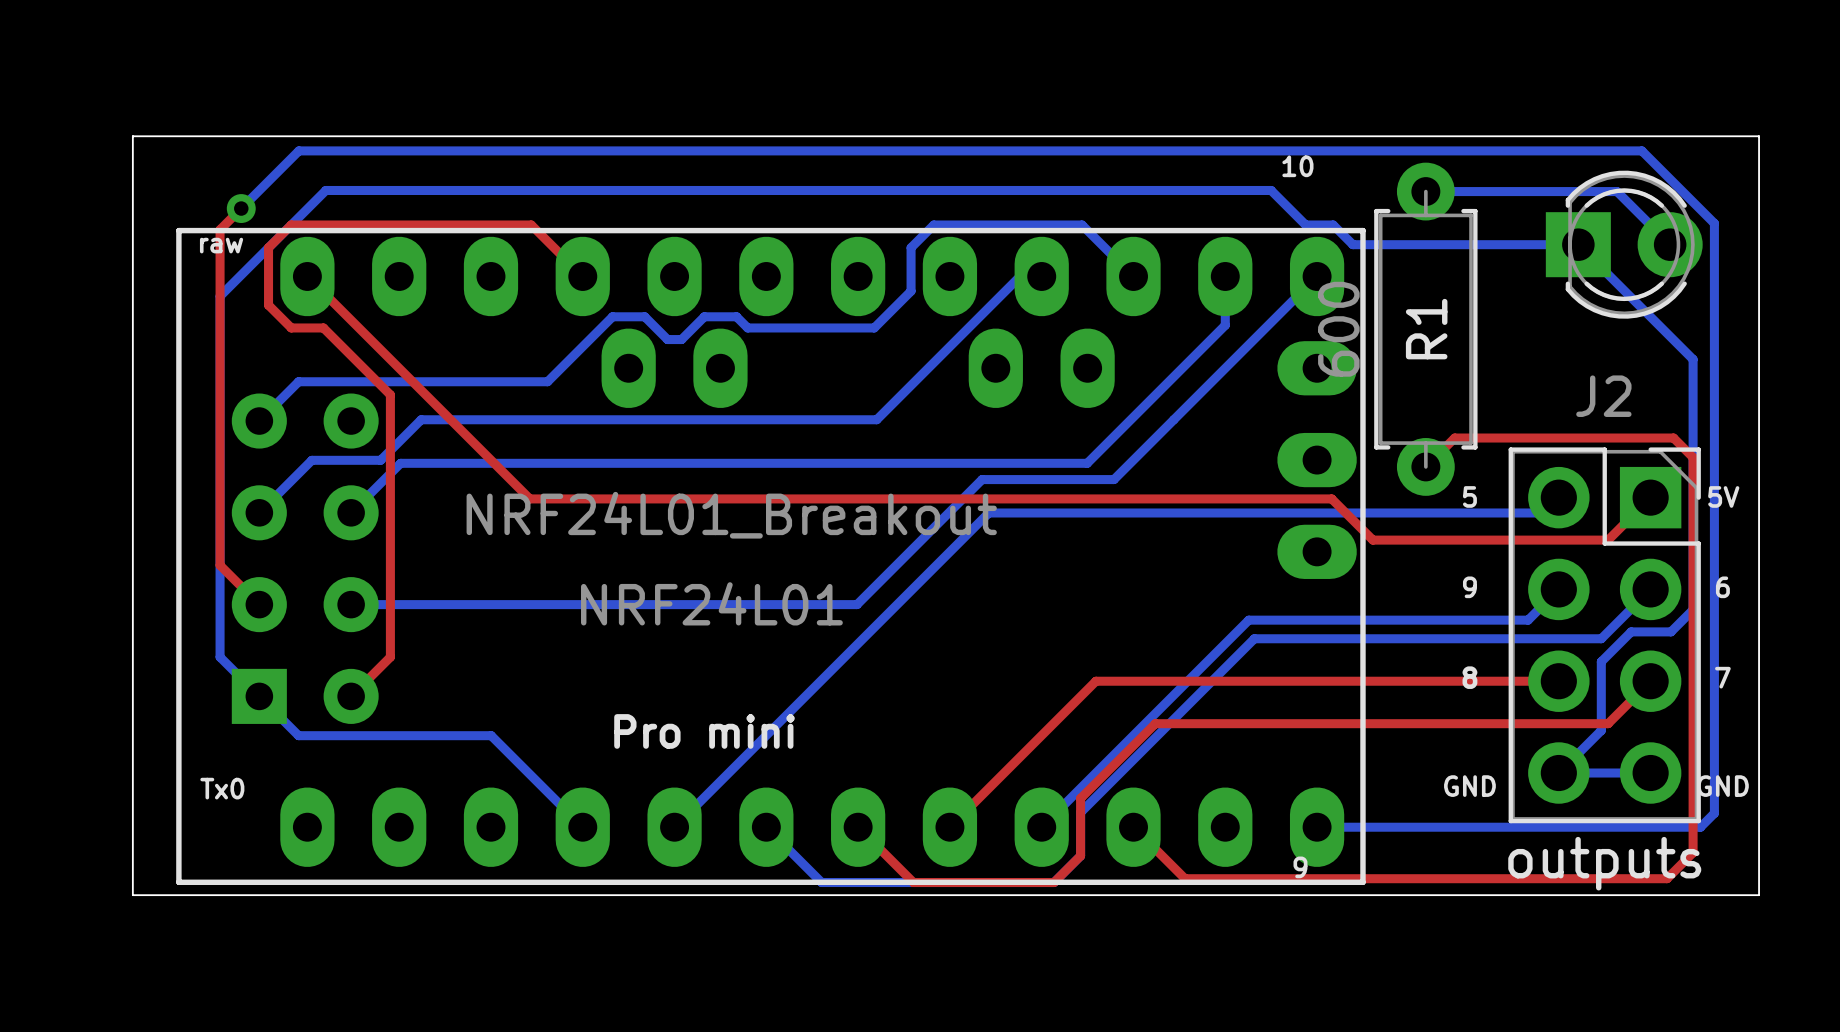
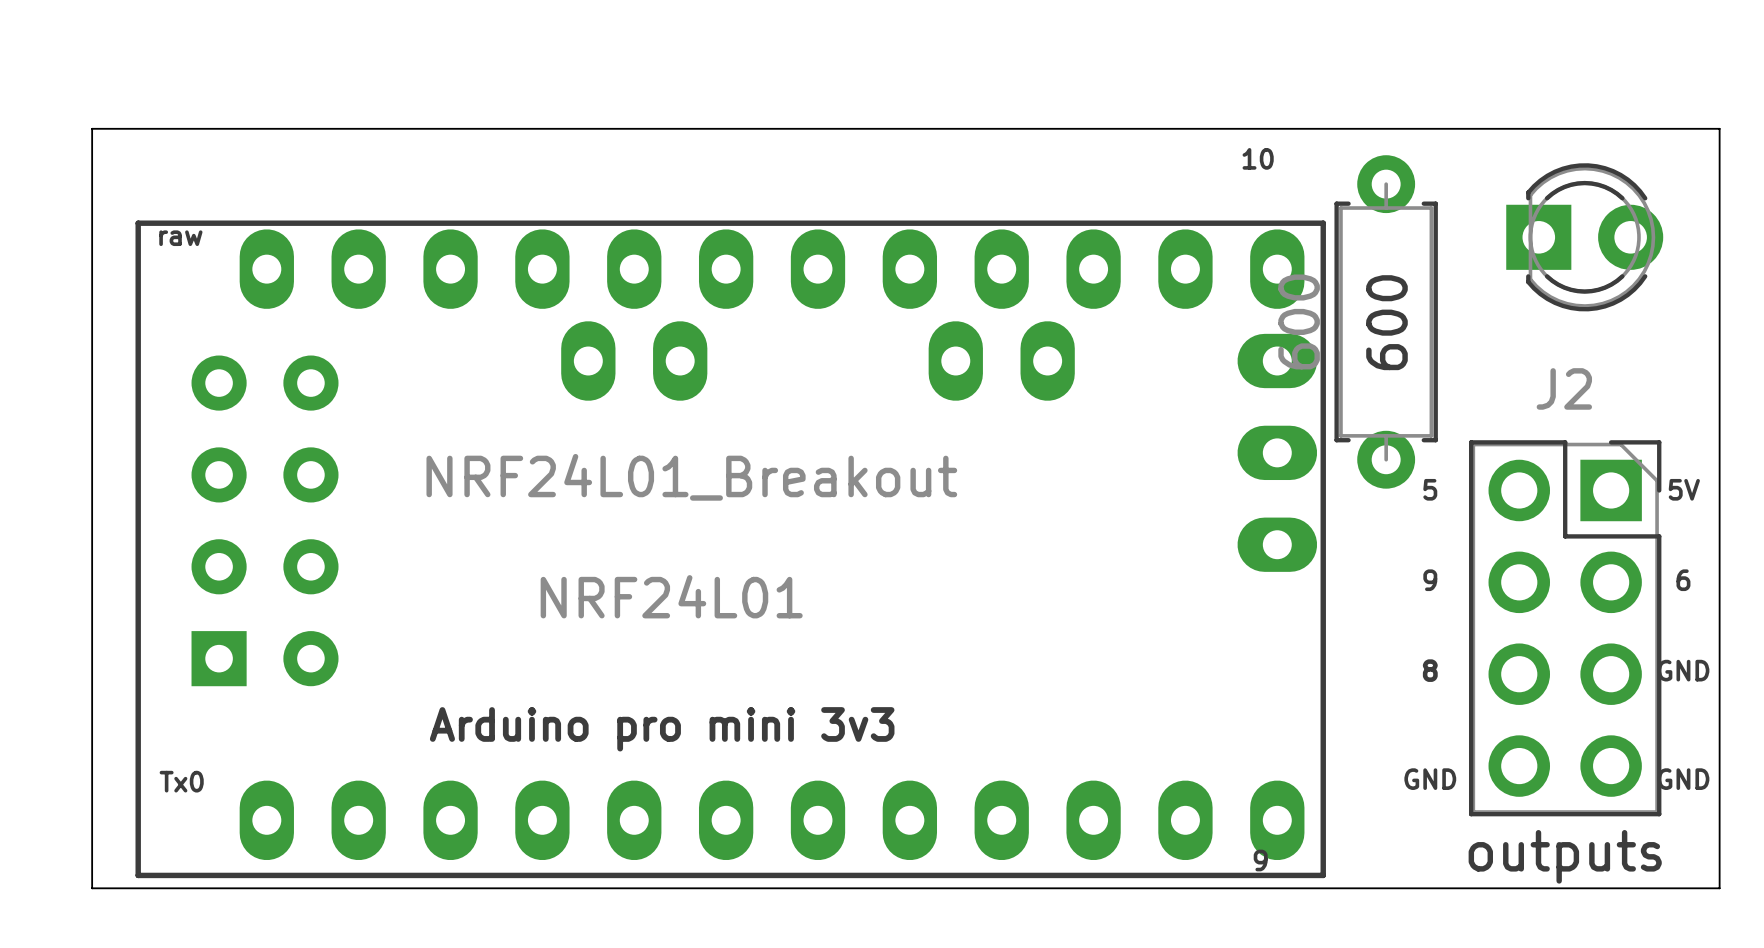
bottom track: (1425, 191) (1617, 191) (1670, 244) -> none
bottom track: (241, 208) (298, 150) (1641, 150) (1714, 223) (1714, 813) (1700, 827) (1317, 827) -> none
top track: (241, 208) (220, 229) (220, 565) (259, 604) -> none
via: (241, 208) -> none
top track: (307, 276) (529, 498) (1331, 498) (1372, 540) (1608, 540) (1650, 497) -> none
top track: (582, 276) (531, 224) (291, 224) (268, 247) (268, 305) (291, 327) (323, 327) (390, 394) (390, 657) (351, 696) -> none
bottom track: (1041, 276) (1020, 276) (876, 419) (421, 419) (380, 460) (311, 460) (259, 512) -> none
bottom track: (1133, 276) (1082, 224) (933, 224) (911, 247) (911, 291) (874, 327) (747, 327) (736, 316) (704, 316) (681, 339) (667, 339) (644, 316) (612, 316) (547, 381) (298, 381) (259, 421) -> none
bottom track: (1225, 276) (1225, 325) (1087, 463) (400, 463) (351, 512) -> none
bottom track: (1317, 276) (1113, 479) (982, 479) (857, 604) (351, 604) -> none
R1 name: R1 (1426, 329) -> 600 (1386, 322)
top track: (1425, 466) (1454, 438) (1673, 438) (1693, 457) (1693, 852) (1667, 878) (1185, 878) (1133, 827) -> none
bottom track: (1558, 497) (1543, 512) (988, 512) (674, 827) -> none
NRF24L01 position: (305, 558) -> (265, 520)
bottom track: (1558, 589) (1528, 620) (1248, 620) (1041, 827) -> none
bottom track: (1650, 589) (1601, 638) (1254, 638) (1080, 812) (1080, 855) (1054, 882) (821, 882) (766, 827) -> none
text: 7 (1722, 677) -> GND (1683, 670)
top track: (1558, 681) (1095, 681) (949, 827) -> none
top track: (1650, 681) (1608, 723) (1155, 723) (1080, 798) (1080, 855) (1054, 882) (913, 882) (858, 827) -> none
Pro mini name: Pro mini (704, 731) -> Arduino pro mini 3v3 (662, 729)
bottom track: (1650, 773) (1558, 773) (1601, 730) (1601, 661) (1631, 631) (1671, 631) (1693, 609) (1693, 359) (1578, 244) (1352, 244) (1333, 224) (1305, 224) (1271, 190) (325, 190) (220, 296) (220, 657) (298, 735) (491, 735) (582, 827) -> none

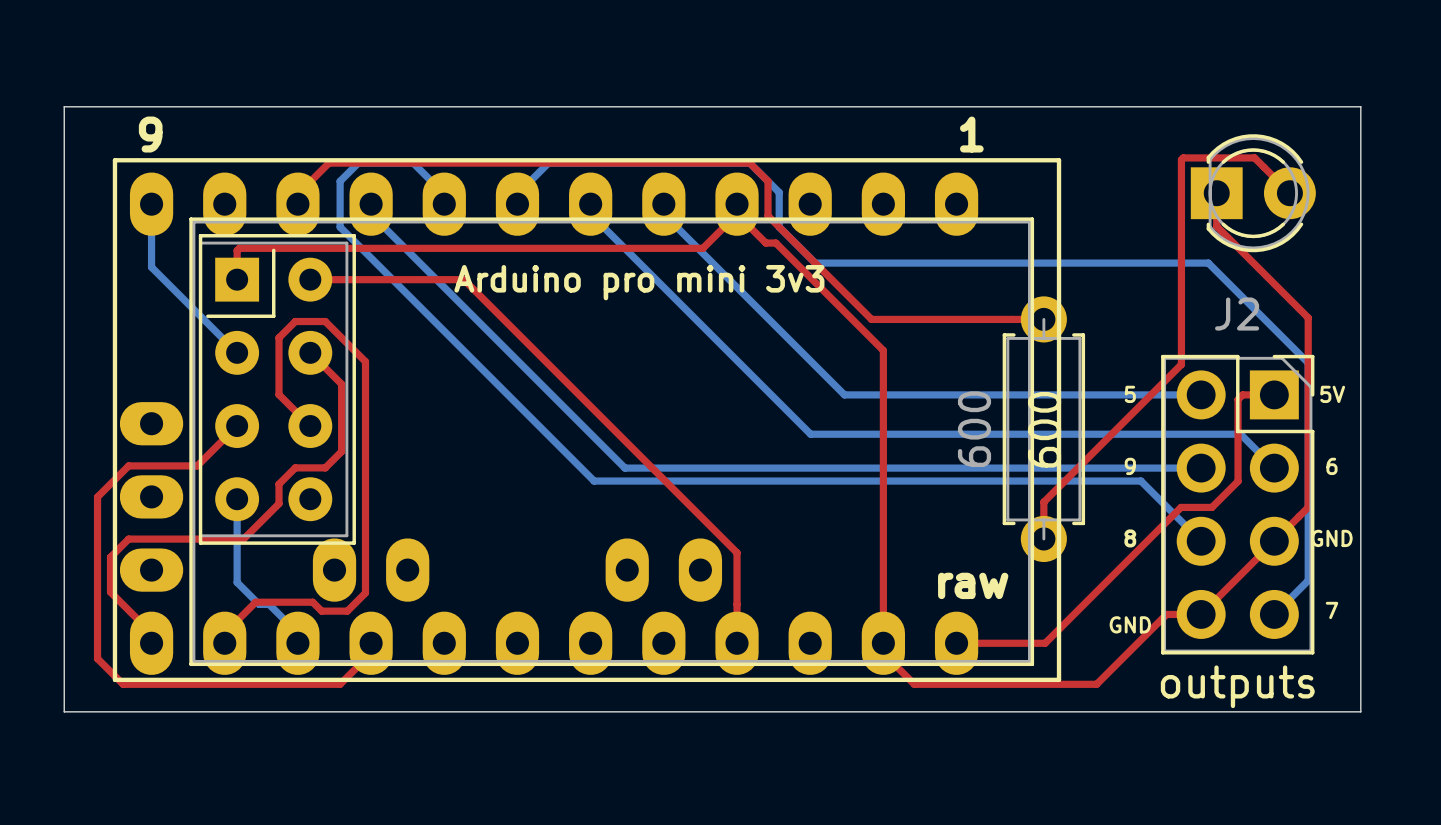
text: 10 (1258, 158) -> 1 (971, 134)
text: none -> 9 (150, 134)
top track: none -> (1216, 193) (1216, 226) (1308, 317) (1308, 507) (1201, 614) (1166, 614) (1096, 684) (914, 684) (883, 653) (883, 350) (775, 243) (765, 243) (737, 214)
top track: none -> (1289, 193) (1254, 157) (1183, 157) (1181, 159) (1181, 364) (1043, 502) (1043, 538)
text: raw (180, 238) -> none
bottom track: none -> (151, 204) (151, 267) (237, 352)
top track: none -> (297, 204) (297, 194) (328, 163) (749, 163) (768, 181) (768, 215) (871, 319) (1043, 319)
bottom track: none -> (371, 204) (371, 214) (624, 468) (1201, 468)
bottom track: none -> (444, 204) (444, 194) (413, 163) (358, 163) (340, 181) (340, 227) (594, 481) (1140, 481) (1201, 541)
bottom track: none -> (517, 204) (517, 194) (548, 163) (749, 163) (779, 192) (779, 227) (815, 263) (1208, 263) (1308, 362) (1308, 580) (1274, 614)
bottom track: none -> (590, 204) (590, 214) (810, 434) (1240, 434) (1274, 468)
bottom track: none -> (663, 204) (663, 214) (844, 394) (1201, 394)
top track: none -> (737, 214) (702, 248) (239, 248) (237, 250) (237, 279)
600 position: (1386, 321) -> (1043, 429)
top track: none -> (310, 279) (463, 279) (737, 552) (737, 643)
top track: none -> (310, 352) (341, 384) (341, 451) (325, 467) (295, 467) (279, 484) (279, 503) (243, 539) (128, 539) (110, 557) (110, 592) (151, 633) (151, 643)
top track: none -> (1274, 394) (1242, 394) (1238, 399) (1238, 481) (1211, 507) (1181, 507) (1045, 643) (956, 643)
NRF24L01 side: bottom (265, 520) -> top (611, 441)
top track: none -> (237, 426) (197, 465) (128, 465) (97, 497) (97, 658) (123, 684) (340, 684) (371, 653) (371, 643)
top track: none -> (310, 426) (279, 394) (279, 337) (295, 321) (325, 321) (365, 361) (365, 592) (347, 611) (321, 611) (312, 602) (255, 602) (224, 633) (224, 643)
Arduino pro mini 3v3 rotation: 0° (730, 549) -> 180° (586, 420)
bottom track: none -> (237, 499) (237, 582) (259, 604) (269, 604) (297, 633) (297, 643)
text: none -> raw (973, 585)
text: GND (1683, 779) -> 7 (1331, 610)
text: Tx0 (181, 781) -> none
text: 9 (1260, 860) -> none

